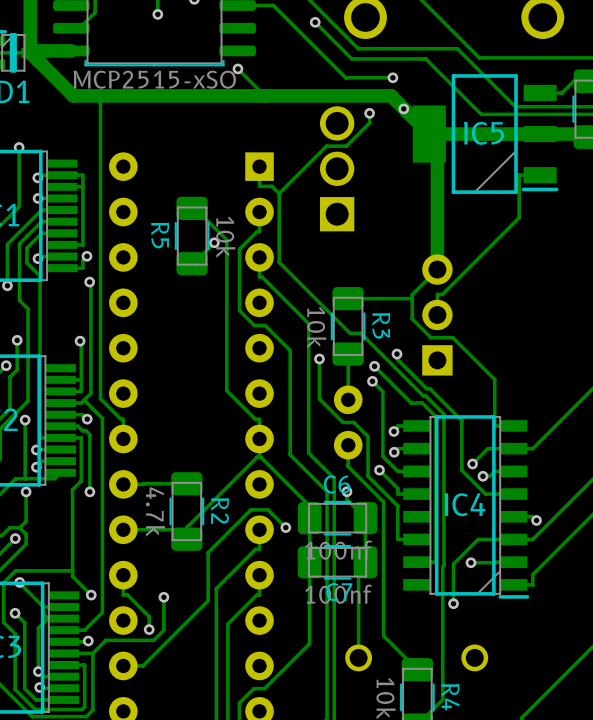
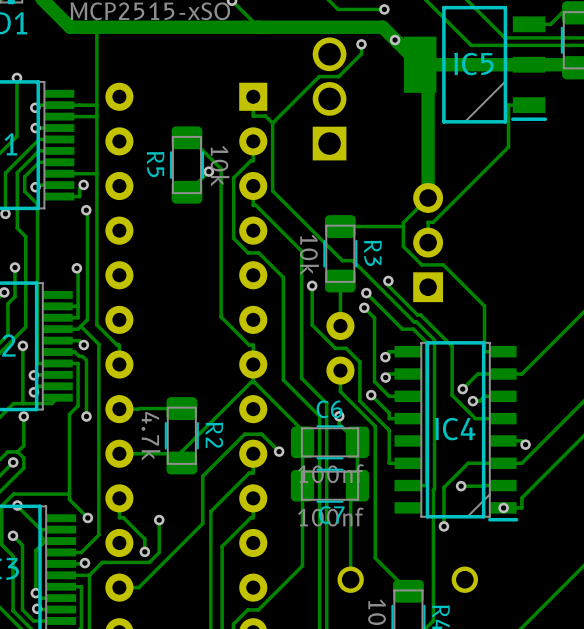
track: (82, 175) (82, 244) -> (96, 173) (79, 173)
track: none -> (96, 105) (79, 105)
track: none -> (96, 116) (79, 116)
via: none -> (503, 507)

